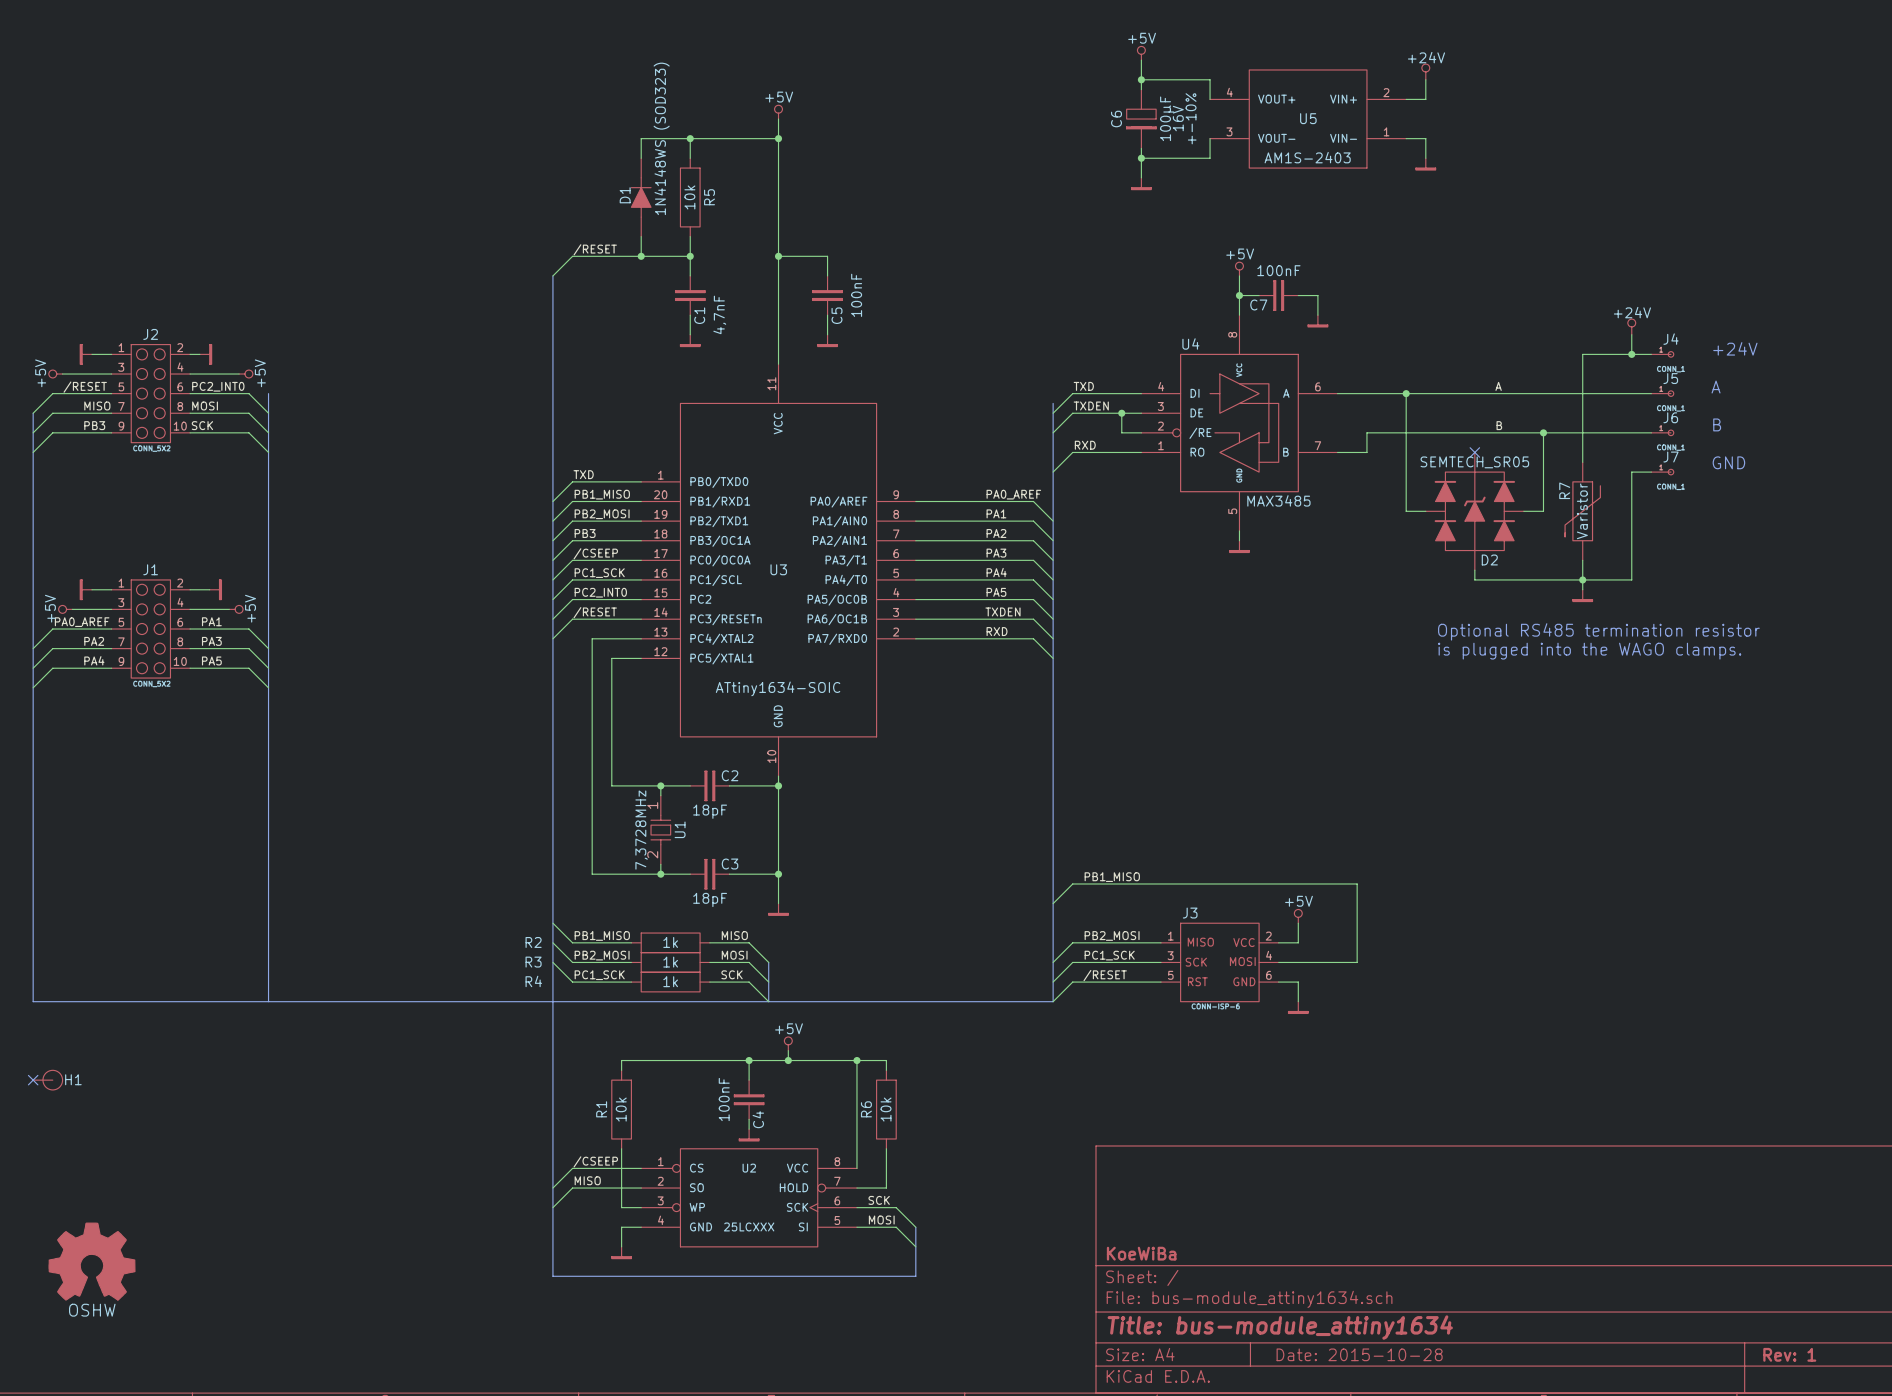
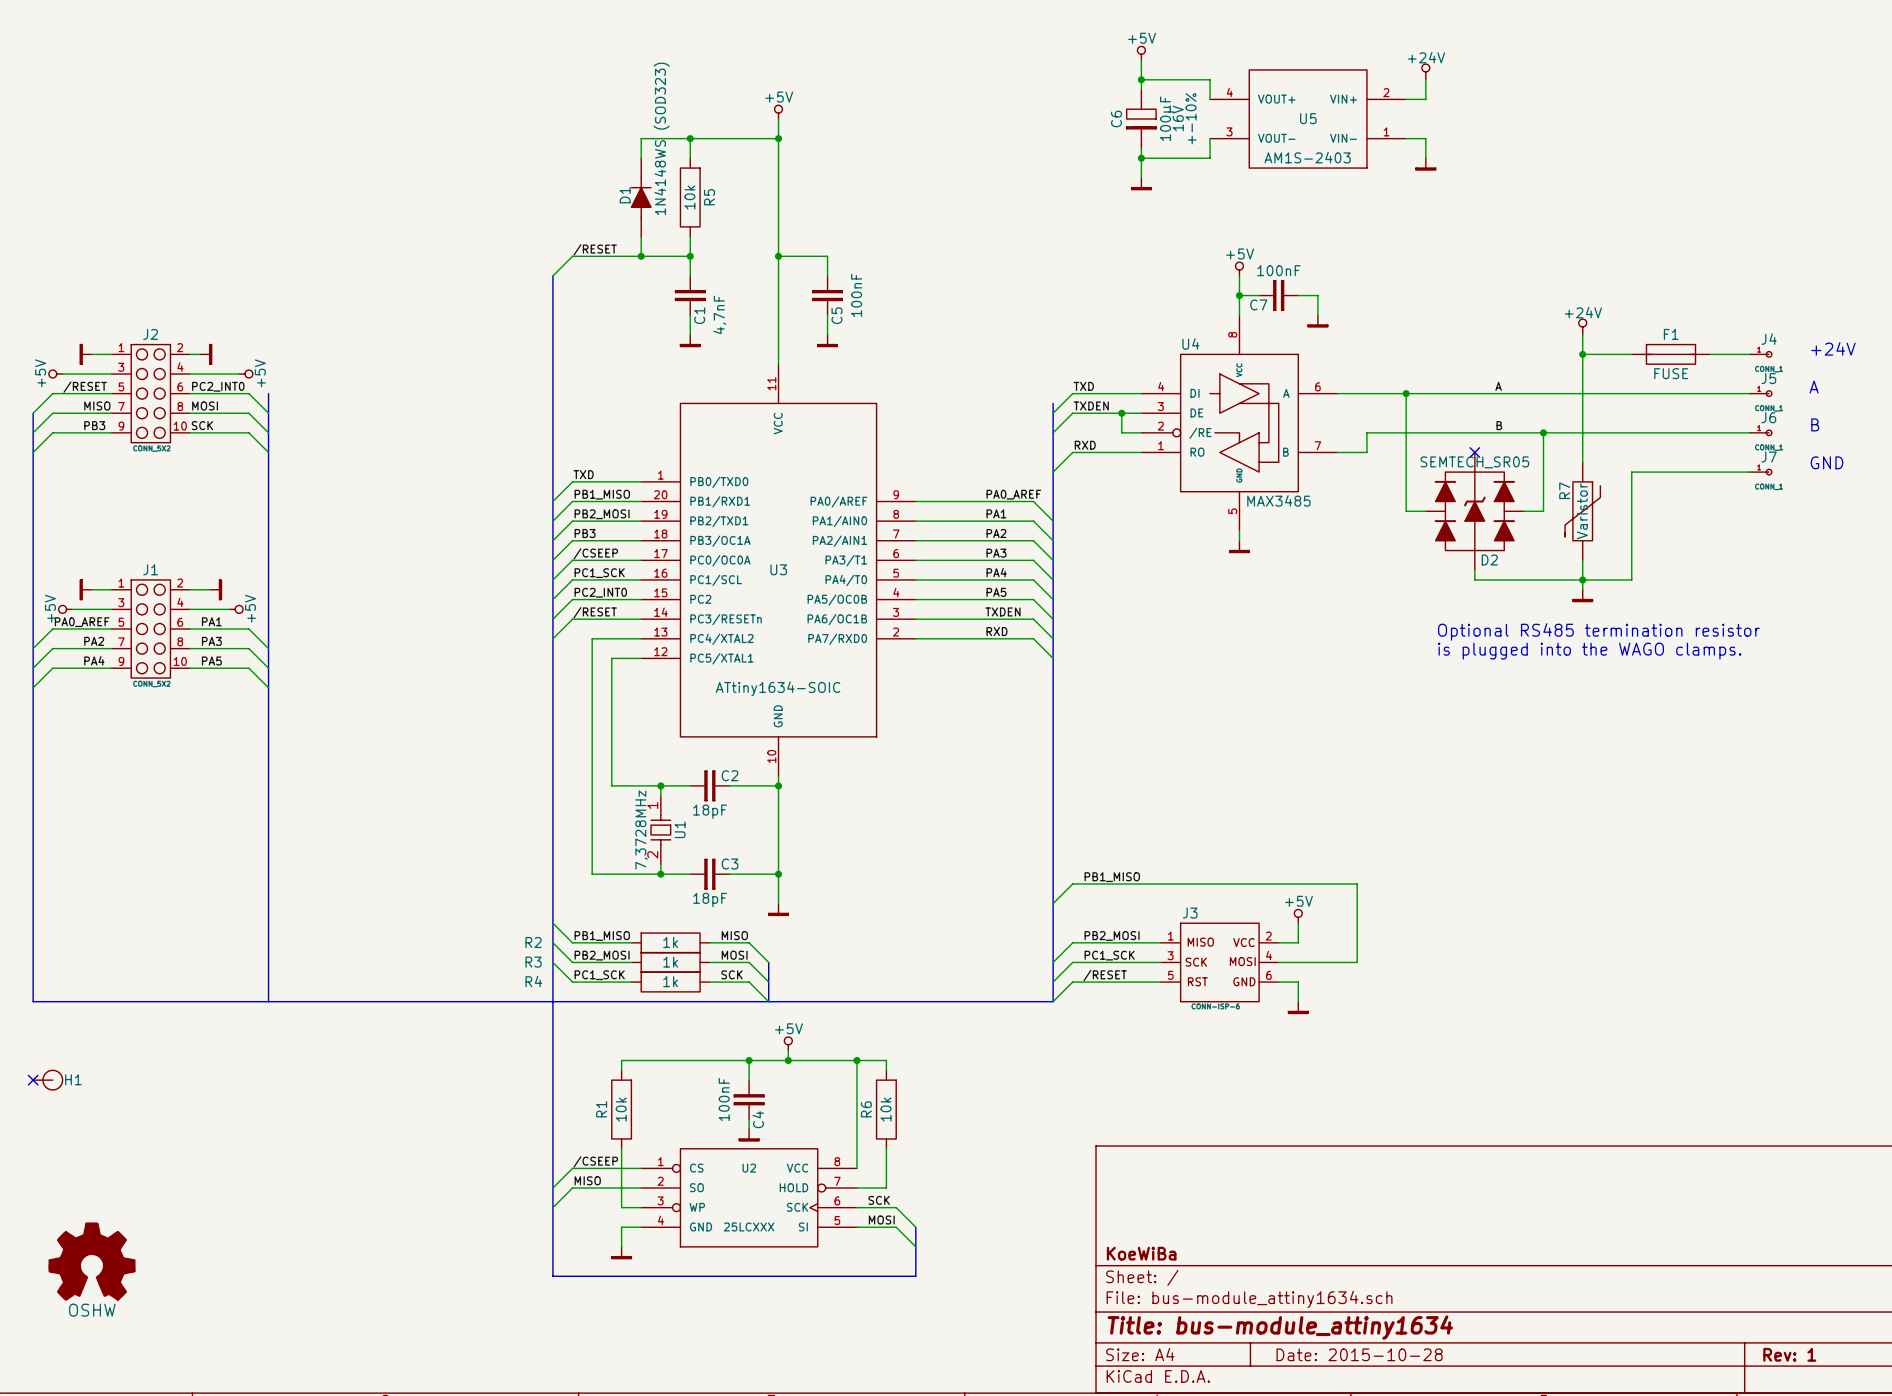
power symbol position: +24V (1631, 326) -> +24V (1582, 326)
wire: none -> (1582, 334) (1582, 354)
wire: (1631, 334) (1631, 354) (1651, 354) -> none
text position: +24V (1735, 348) -> +24V (1833, 348)
junction: none -> (1582, 354)
junction: (1631, 354) -> none
J4 position: (1662, 354) -> (1760, 354)
F1: none -> FUSE (1670, 354)
wire: none -> (1710, 354) (1749, 354)
text position: A (1716, 387) -> A (1814, 387)
wire: none -> (1651, 393) (1749, 393)
J5 position: (1662, 393) -> (1760, 393)
text position: B (1717, 424) -> B (1815, 424)
wire: none -> (1651, 432) (1749, 432)
J6 position: (1662, 432) -> (1760, 432)
text position: GND (1728, 462) -> GND (1827, 462)
wire: none -> (1651, 472) (1749, 472)
J7 position: (1662, 472) -> (1760, 472)

